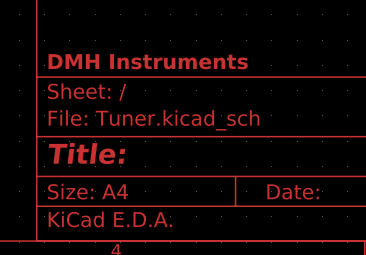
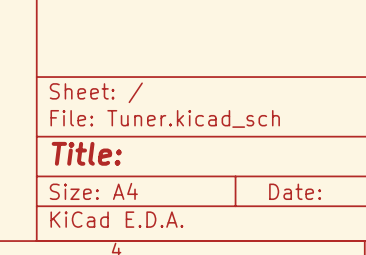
title block: DMH Instruments (148, 61) -> none

